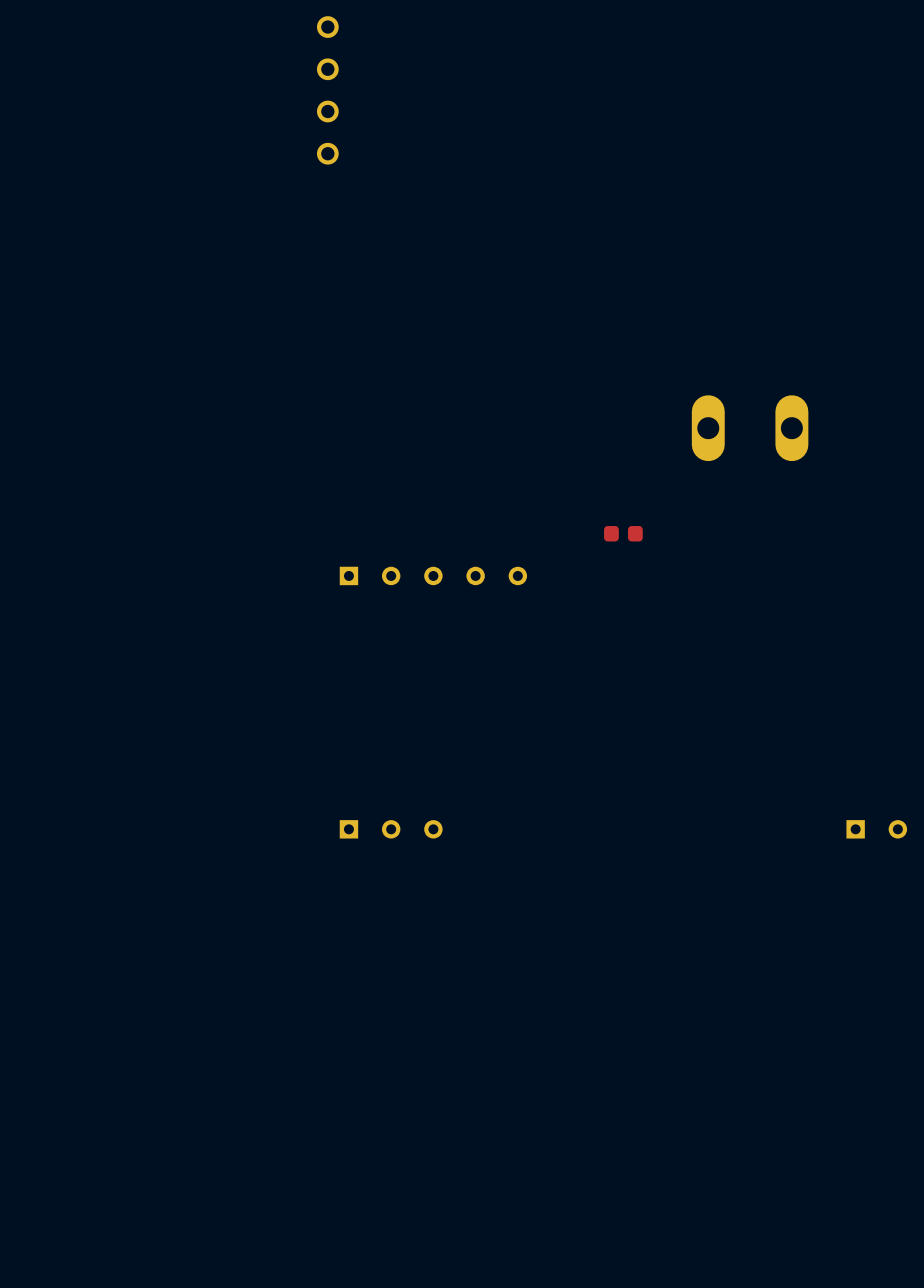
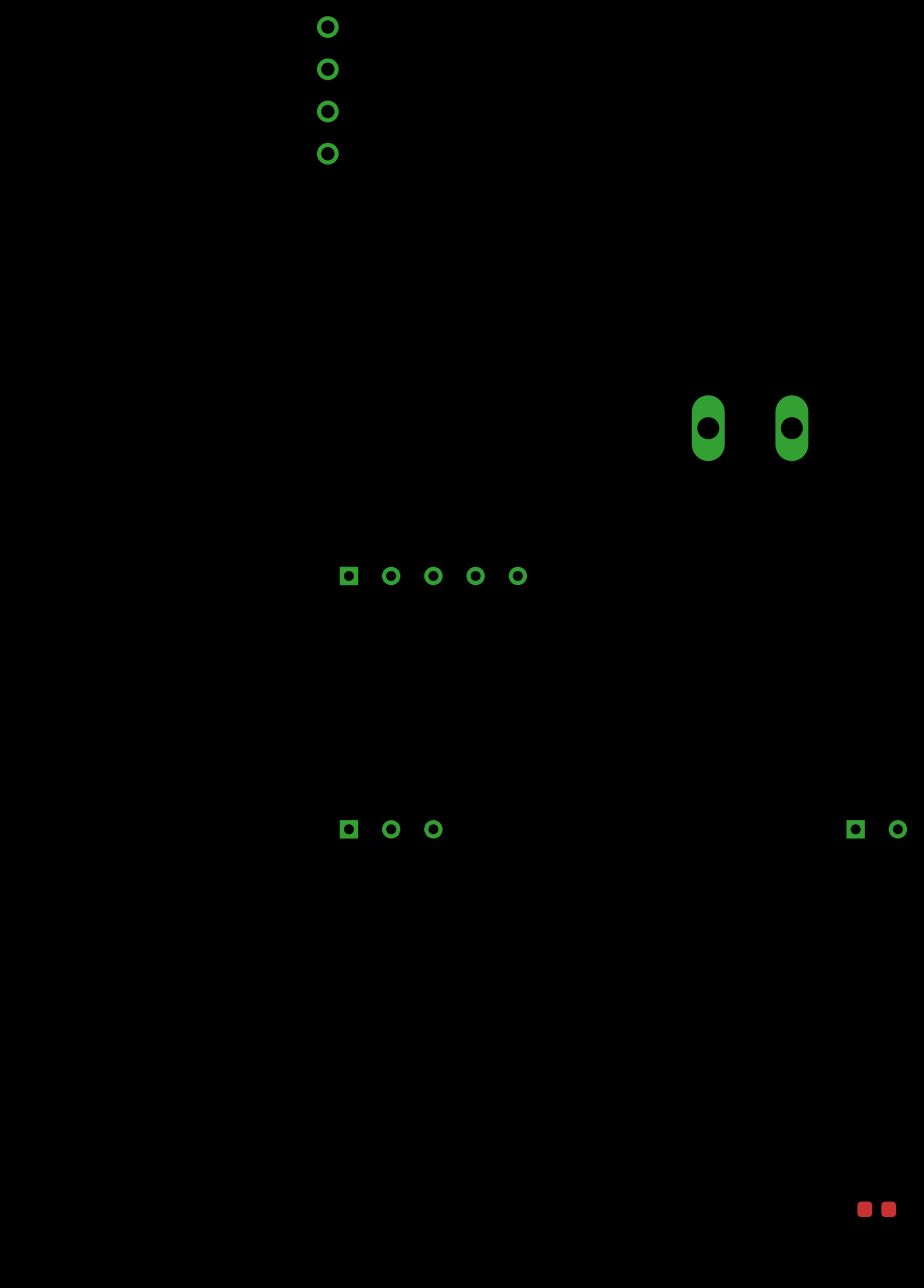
part: (623, 533) -> none
part: none -> (876, 1209)

